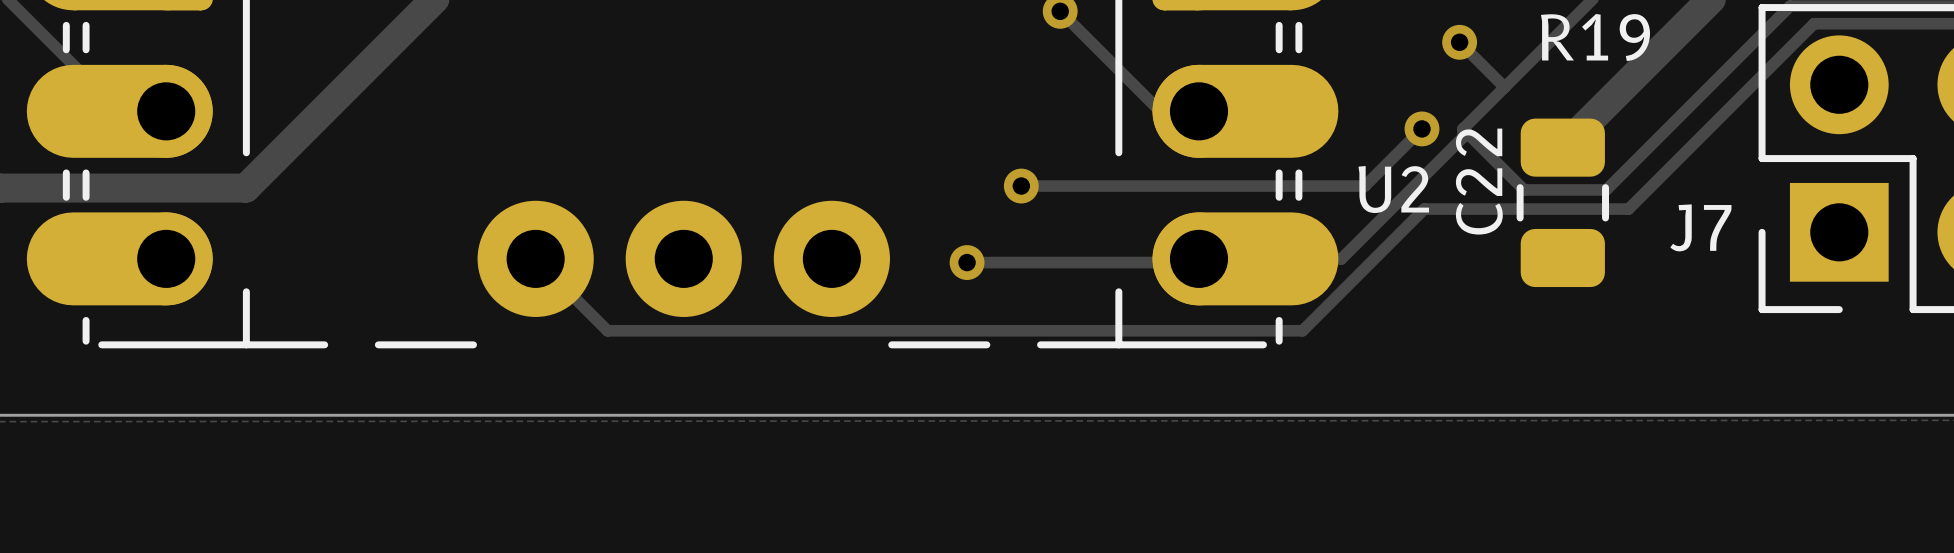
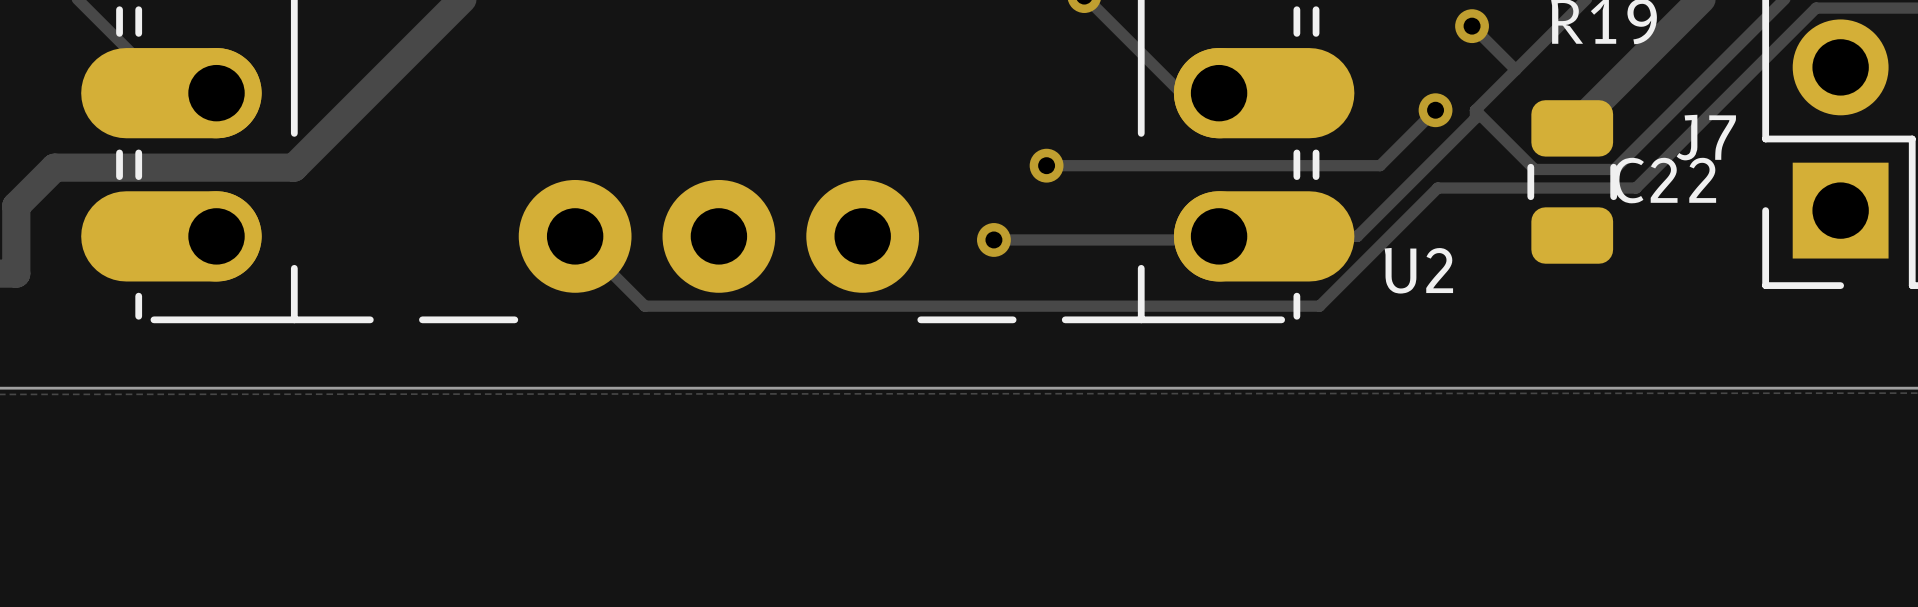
C22 name rotation: 0° (1479, 181) -> 90° clockwise (1664, 180)
C22 name position: C22 (1479, 181) -> C22 (1664, 180)
U2 name position: U2 (1393, 189) -> U2 (1418, 270)
J7 name position: J7 (1700, 227) -> J7 (1706, 137)

